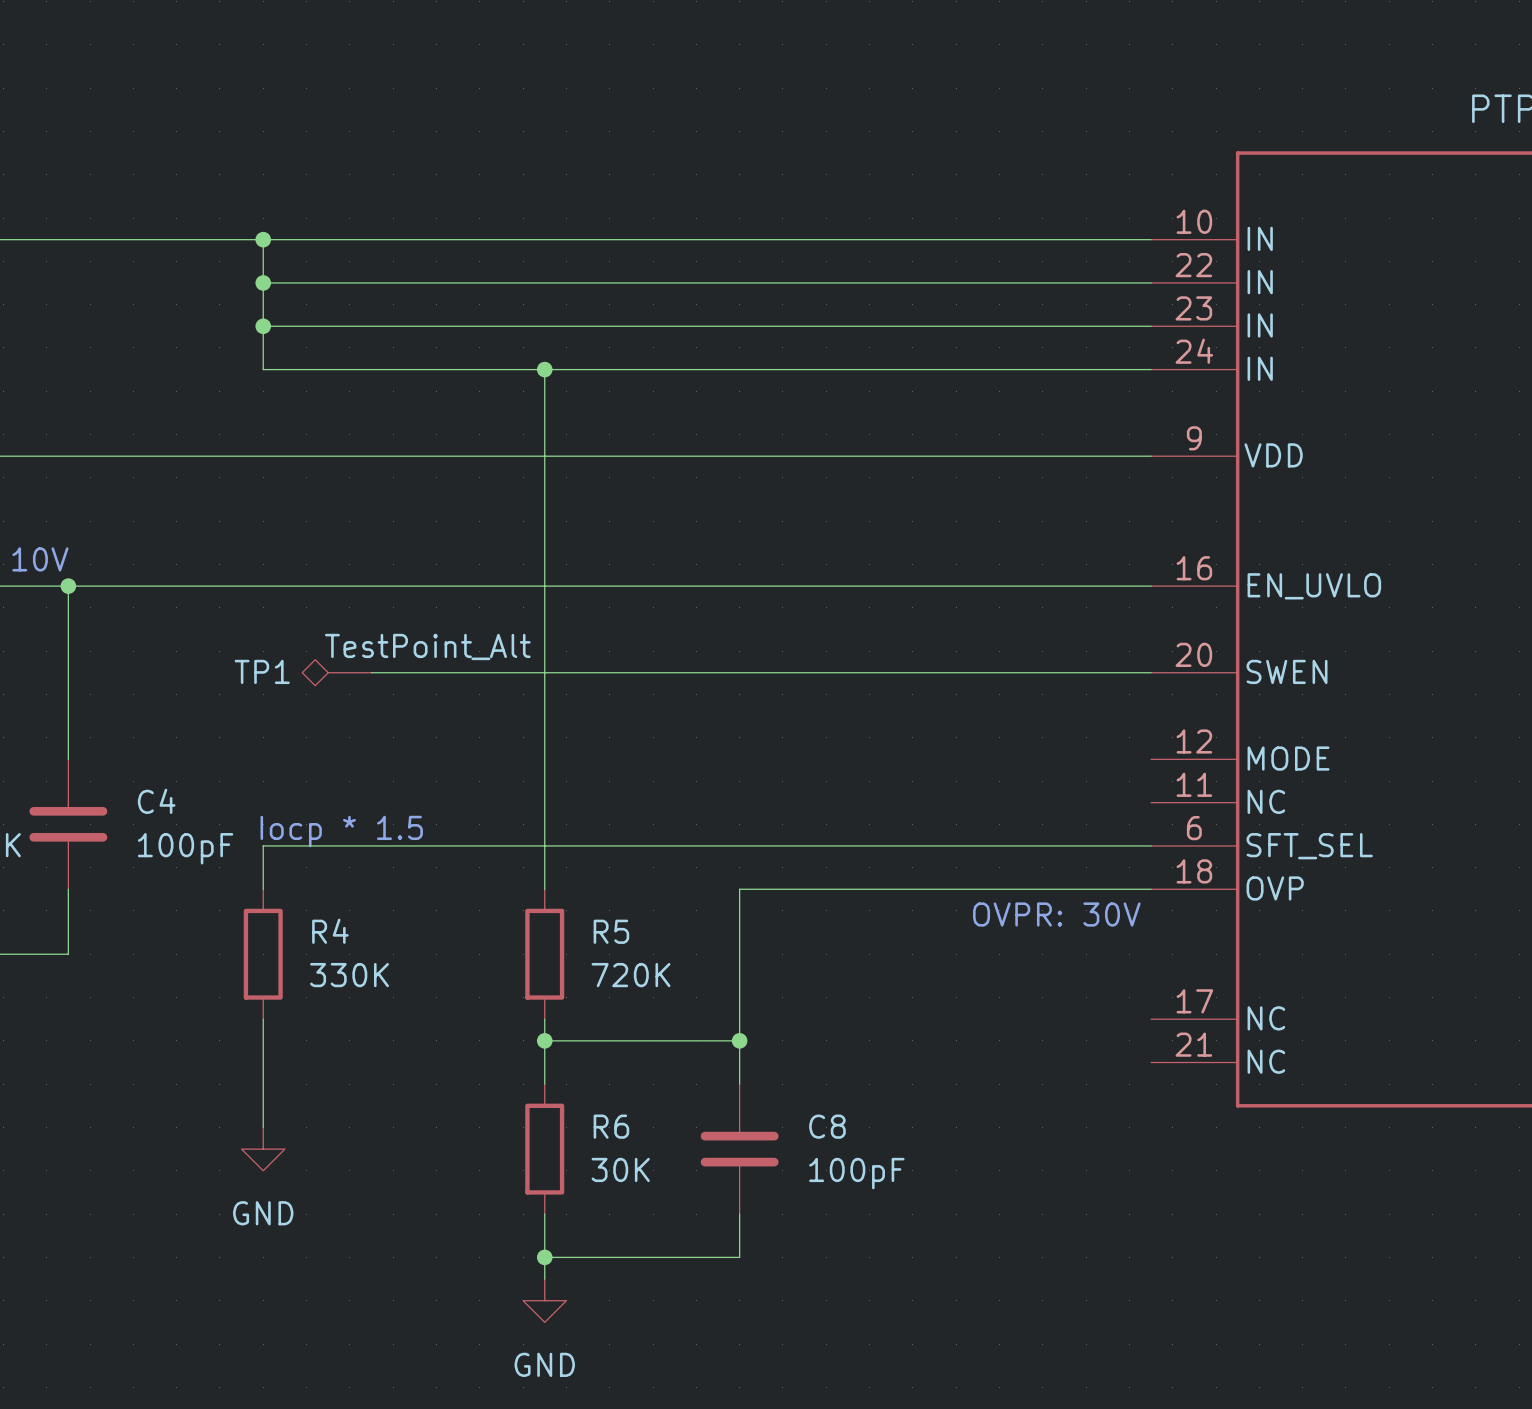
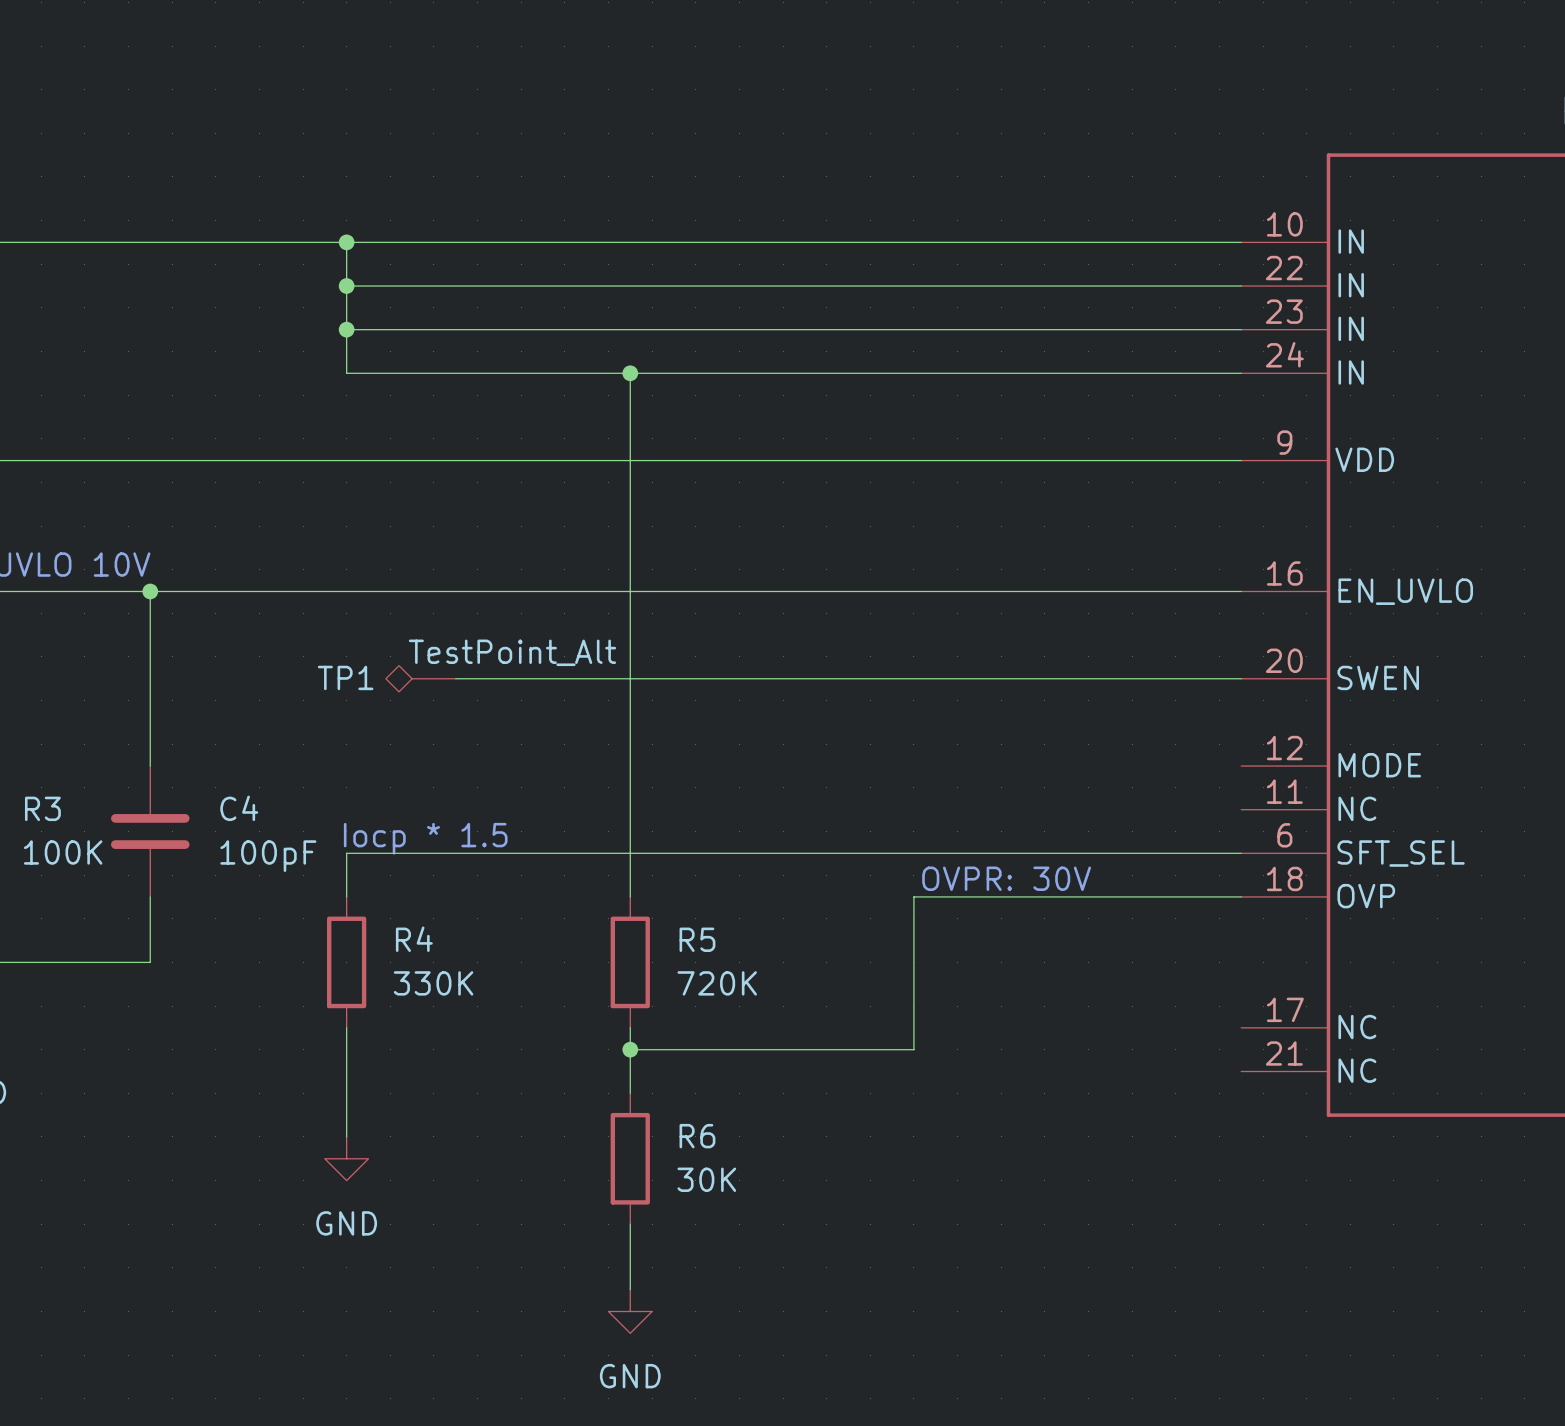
wire: (826, 889) (739, 889) (739, 1084) -> (913, 896) (913, 1049) (826, 1049)
text position: OVPR: 30V (1056, 914) -> OVPR: 30V (1006, 878)
junction: (739, 1040) -> none
C8: 100pF (739, 1149) -> none
wire: (739, 1214) (739, 1257) (544, 1257) -> none
junction: (544, 1257) -> none

